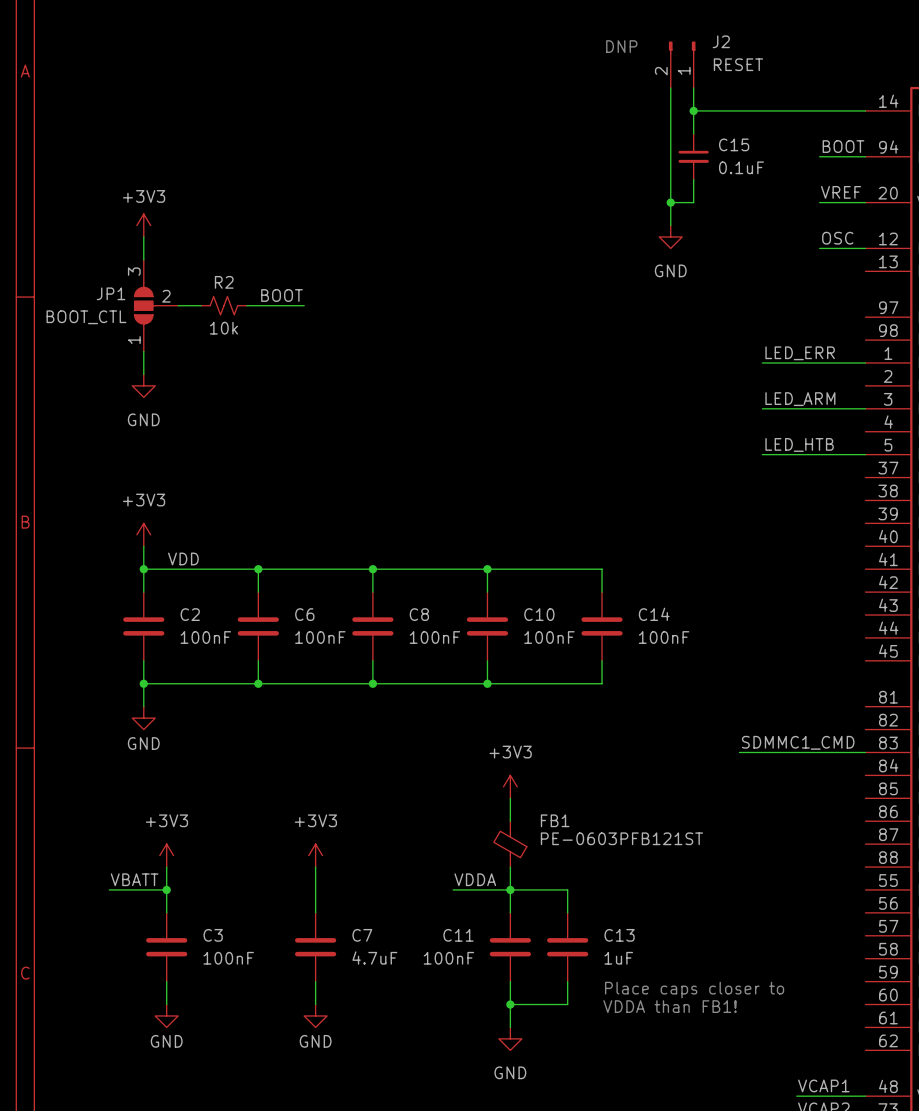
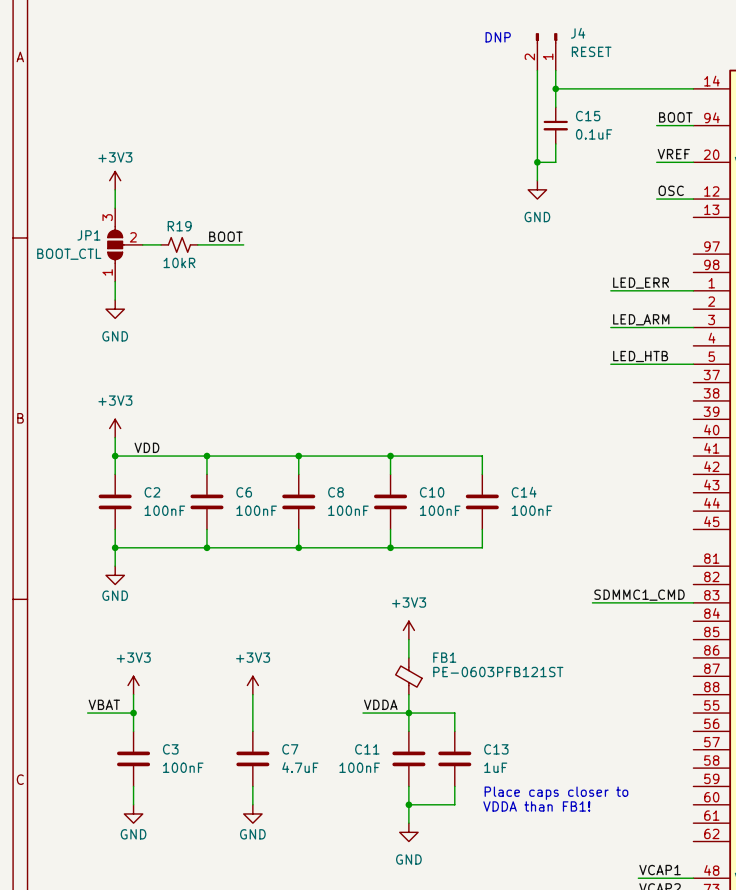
J2 name: J2 (721, 41) -> J4 (578, 33)
R2 name: R2 (224, 282) -> R19 (179, 226)
R2 value: 10k (223, 328) -> 10kR (179, 262)
label: VBATT (134, 879) -> VBAT (104, 704)

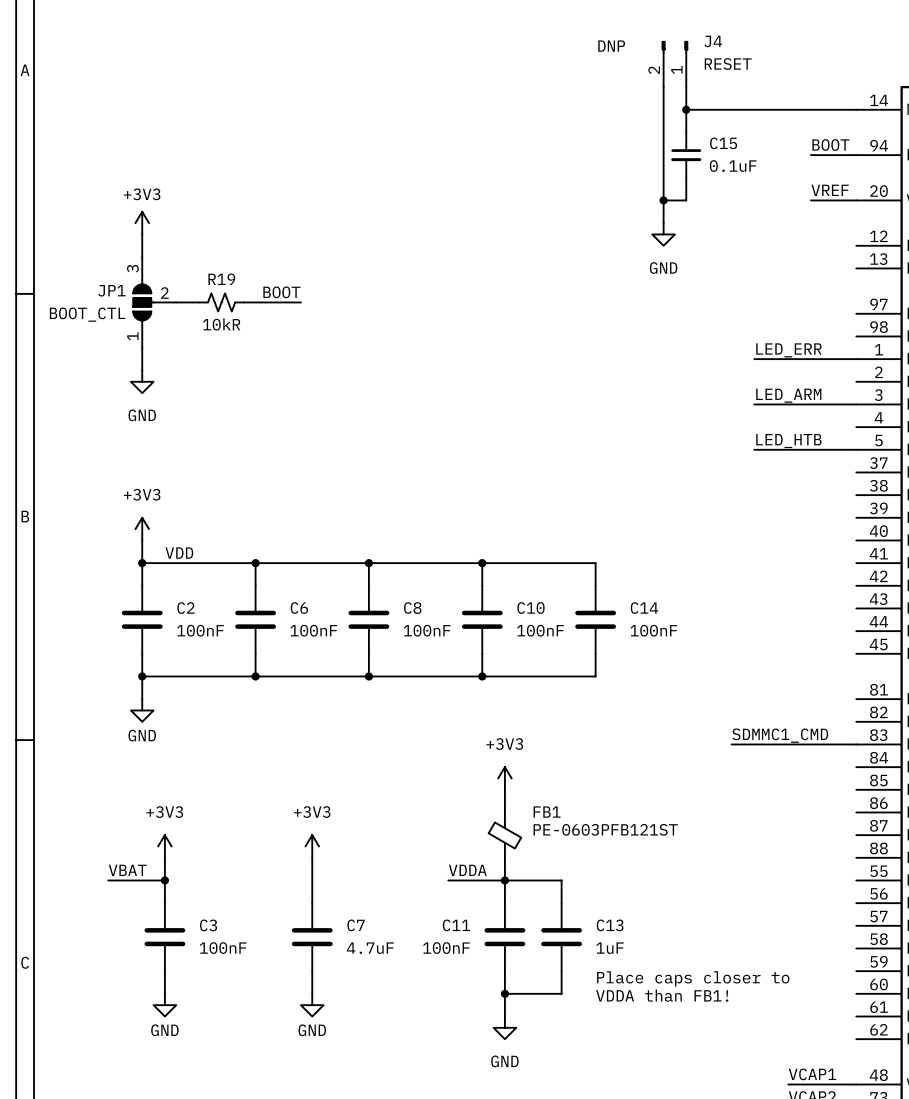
label: OSC (671, 190) -> none
wire: (656, 199) (693, 199) -> none

